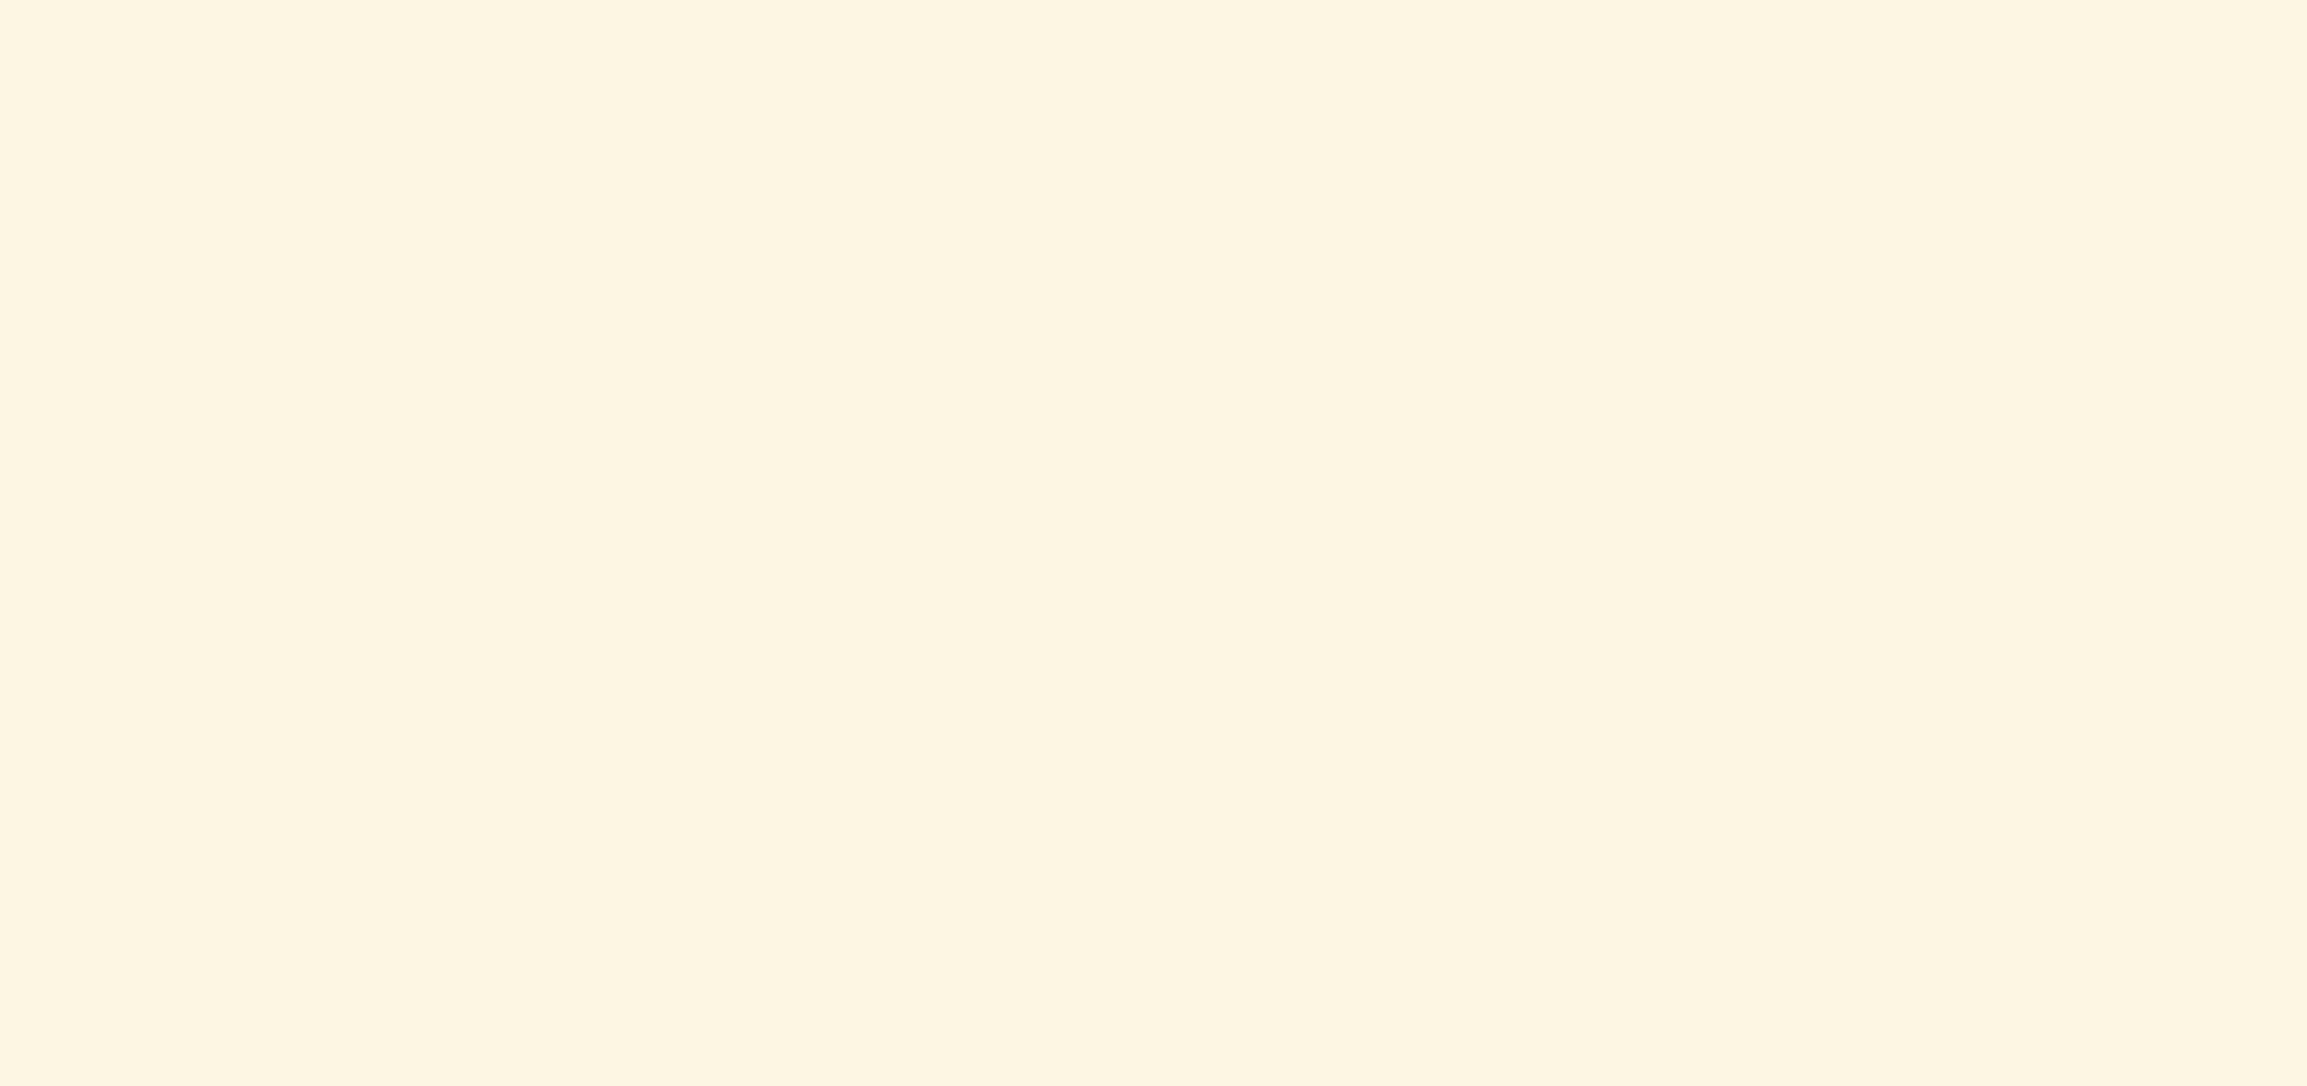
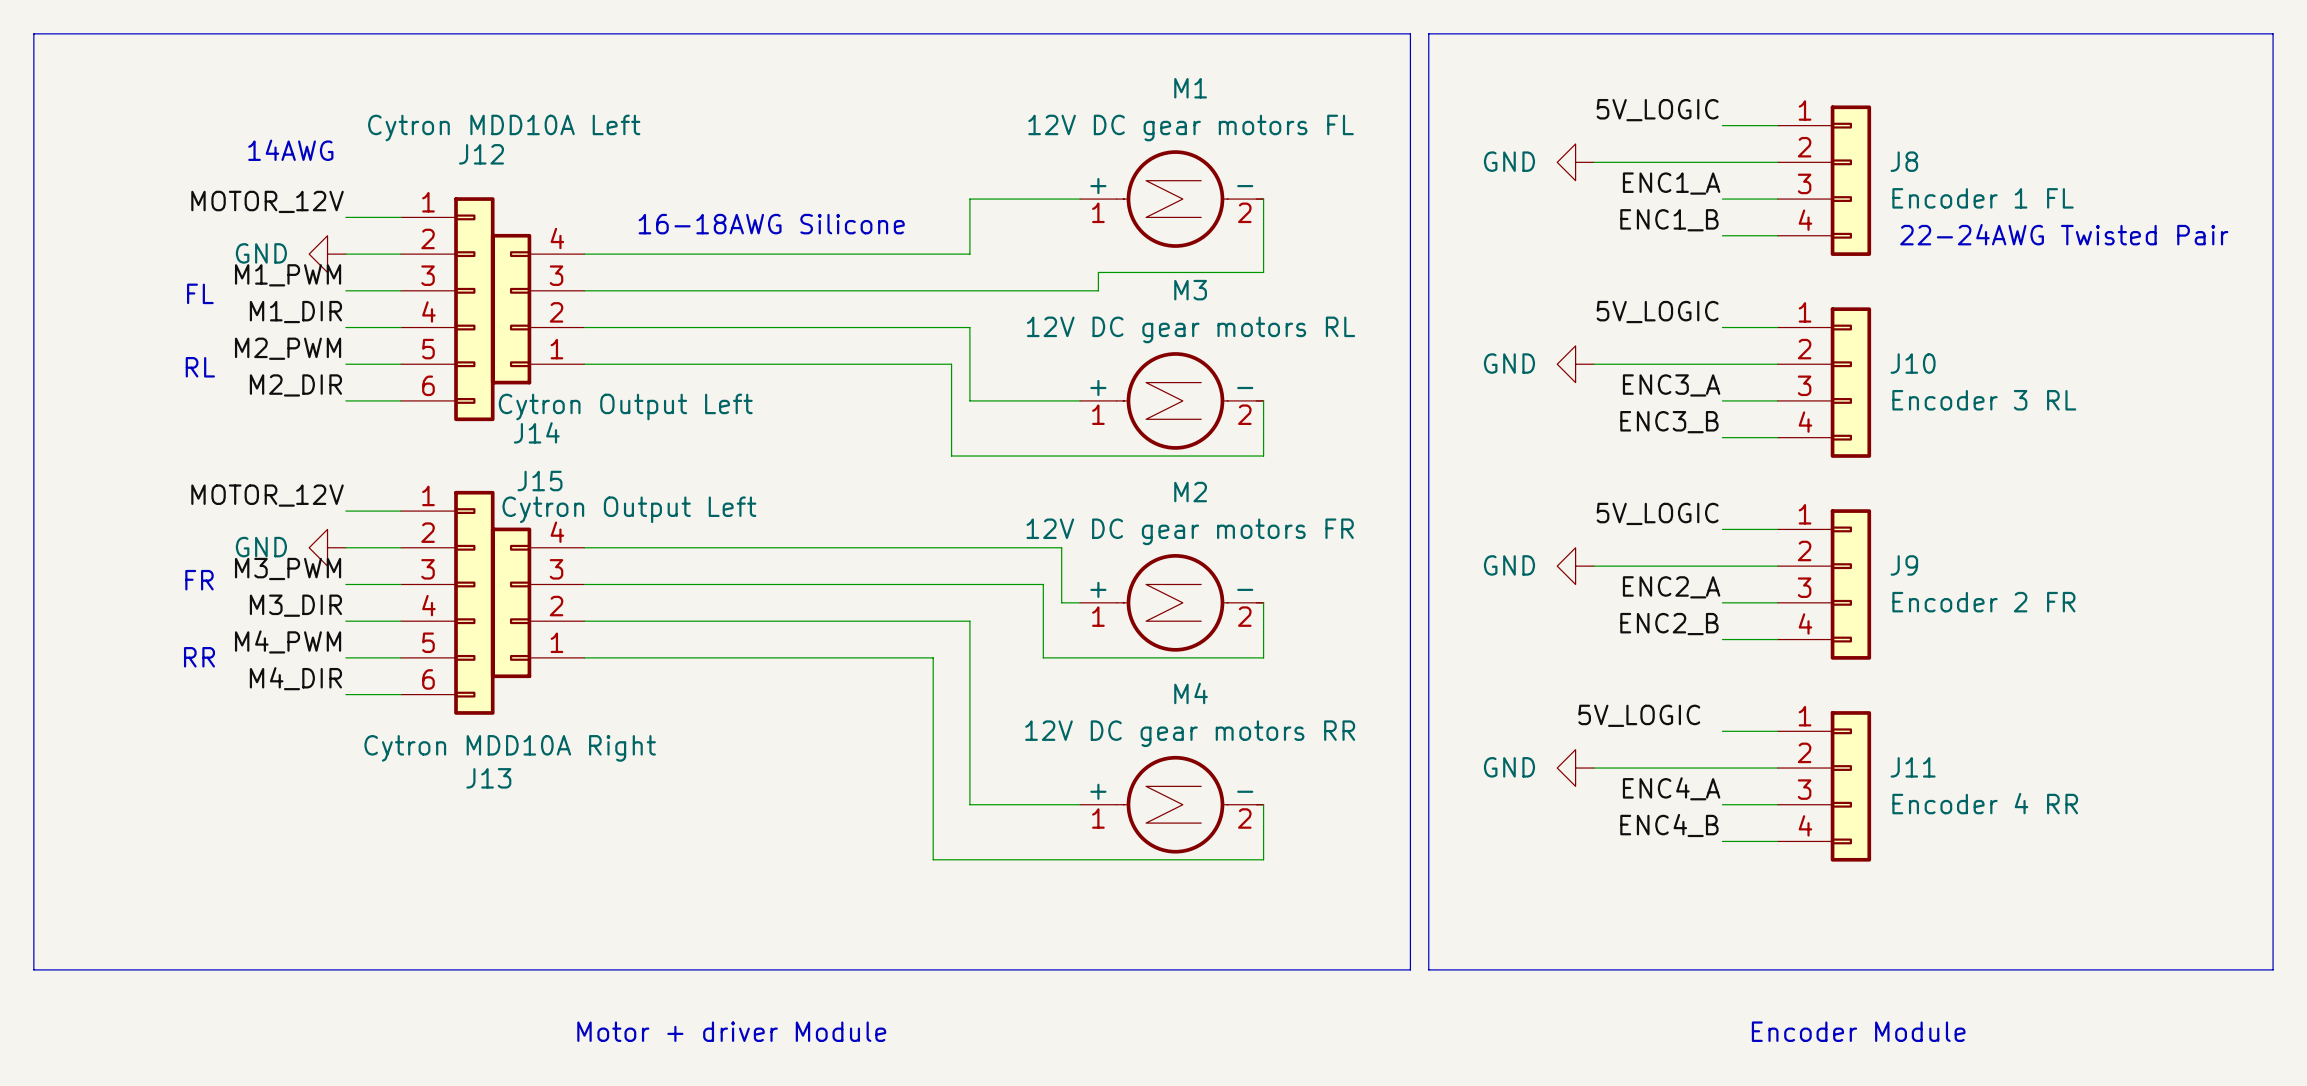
line: none -> (33, 33) (1410, 33) (1410, 969) (33, 969) (33, 33)
line: none -> (1428, 33) (2273, 33) (2273, 969) (1428, 969) (1428, 33)
label: none -> 5V_LOGIC (1657, 110)
wire: none -> (1722, 125) (1777, 125)
text: none -> 14AWG (290, 150)
power symbol: none -> GND (1575, 162)
wire: none -> (1593, 162) (1777, 162)
J8: none -> Encoder 1 FL (1824, 180)
label: none -> ENC1_A (1671, 183)
wire: none -> (1080, 199) (969, 199) (969, 254) (584, 254)
M1: none -> 12V DC gear motors FL (1171, 199)
wire: none -> (1263, 199) (1263, 272) (1098, 272) (1098, 290) (584, 290)
wire: none -> (1722, 199) (1777, 199)
label: none -> MOTOR_12V (267, 201)
wire: none -> (345, 217) (400, 217)
label: none -> ENC1_B (1669, 220)
text: none -> 16-18AWG Silicone (771, 224)
text: none -> 22-24AWG Twisted Pair (2064, 234)
wire: none -> (1722, 235) (1777, 235)
power symbol: none -> GND (327, 254)
wire: none -> (345, 254) (400, 254)
label: none -> M1_PWM (288, 275)
wire: none -> (345, 290) (400, 290)
text: none -> FL (200, 293)
J12: none -> Cytron MDD10A Left (447, 309)
J14: none -> Cytron Output Left (537, 309)
label: none -> M1_DIR (295, 312)
label: none -> 5V_LOGIC (1657, 312)
wire: none -> (345, 327) (400, 327)
wire: none -> (584, 327) (969, 327) (969, 400) (1080, 400)
wire: none -> (1722, 327) (1777, 327)
label: none -> M2_PWM (288, 348)
wire: none -> (345, 364) (400, 364)
wire: none -> (584, 364) (951, 364) (951, 456) (1263, 456) (1263, 400)
power symbol: none -> GND (1575, 364)
wire: none -> (1593, 364) (1777, 364)
text: none -> RL (200, 367)
J10: none -> Encoder 3 RL (1824, 382)
label: none -> M2_DIR (295, 385)
label: none -> ENC3_A (1671, 385)
wire: none -> (345, 400) (400, 400)
M3: none -> 12V DC gear motors RL (1171, 400)
wire: none -> (1722, 400) (1777, 400)
label: none -> ENC3_B (1669, 422)
wire: none -> (1722, 437) (1777, 437)
label: none -> MOTOR_12V (267, 495)
wire: none -> (345, 511) (400, 511)
label: none -> 5V_LOGIC (1657, 513)
wire: none -> (1722, 529) (1777, 529)
power symbol: none -> GND (327, 547)
wire: none -> (345, 547) (400, 547)
wire: none -> (584, 547) (1061, 547) (1061, 602) (1080, 602)
power symbol: none -> GND (1575, 566)
wire: none -> (1593, 566) (1777, 566)
label: none -> M3_PWM (288, 568)
text: none -> FR (199, 580)
wire: none -> (345, 584) (400, 584)
wire: none -> (584, 584) (1043, 584) (1043, 657) (1263, 657) (1263, 602)
J9: none -> Encoder 2 FR (1824, 584)
label: none -> ENC2_A (1671, 587)
J13: none -> Cytron MDD10A Right (447, 602)
J15: none -> Cytron Output Left (537, 602)
M2: none -> 12V DC gear motors FR (1171, 602)
wire: none -> (1722, 602) (1777, 602)
label: none -> M3_DIR (295, 605)
wire: none -> (345, 621) (400, 621)
wire: none -> (584, 621) (969, 621) (969, 804) (1080, 804)
label: none -> ENC2_B (1669, 624)
wire: none -> (1722, 639) (1777, 639)
label: none -> M4_PWM (288, 641)
text: none -> RR (199, 657)
wire: none -> (345, 657) (400, 657)
wire: none -> (584, 657) (933, 657) (933, 859) (1263, 859) (1263, 804)
label: none -> M4_DIR (295, 678)
wire: none -> (345, 694) (400, 694)
label: none -> 5V_LOGIC (1639, 715)
wire: none -> (1722, 731) (1777, 731)
power symbol: none -> GND (1575, 768)
wire: none -> (1593, 768) (1777, 768)
J11: none -> Encoder 4 RR (1824, 786)
label: none -> ENC4_A (1671, 788)
M4: none -> 12V DC gear motors RR (1171, 804)
wire: none -> (1722, 804) (1777, 804)
label: none -> ENC4_B (1669, 825)
wire: none -> (1722, 841) (1777, 841)
text: none -> Motor + driver Module (731, 1031)
text: none -> Encoder Module (1858, 1031)

